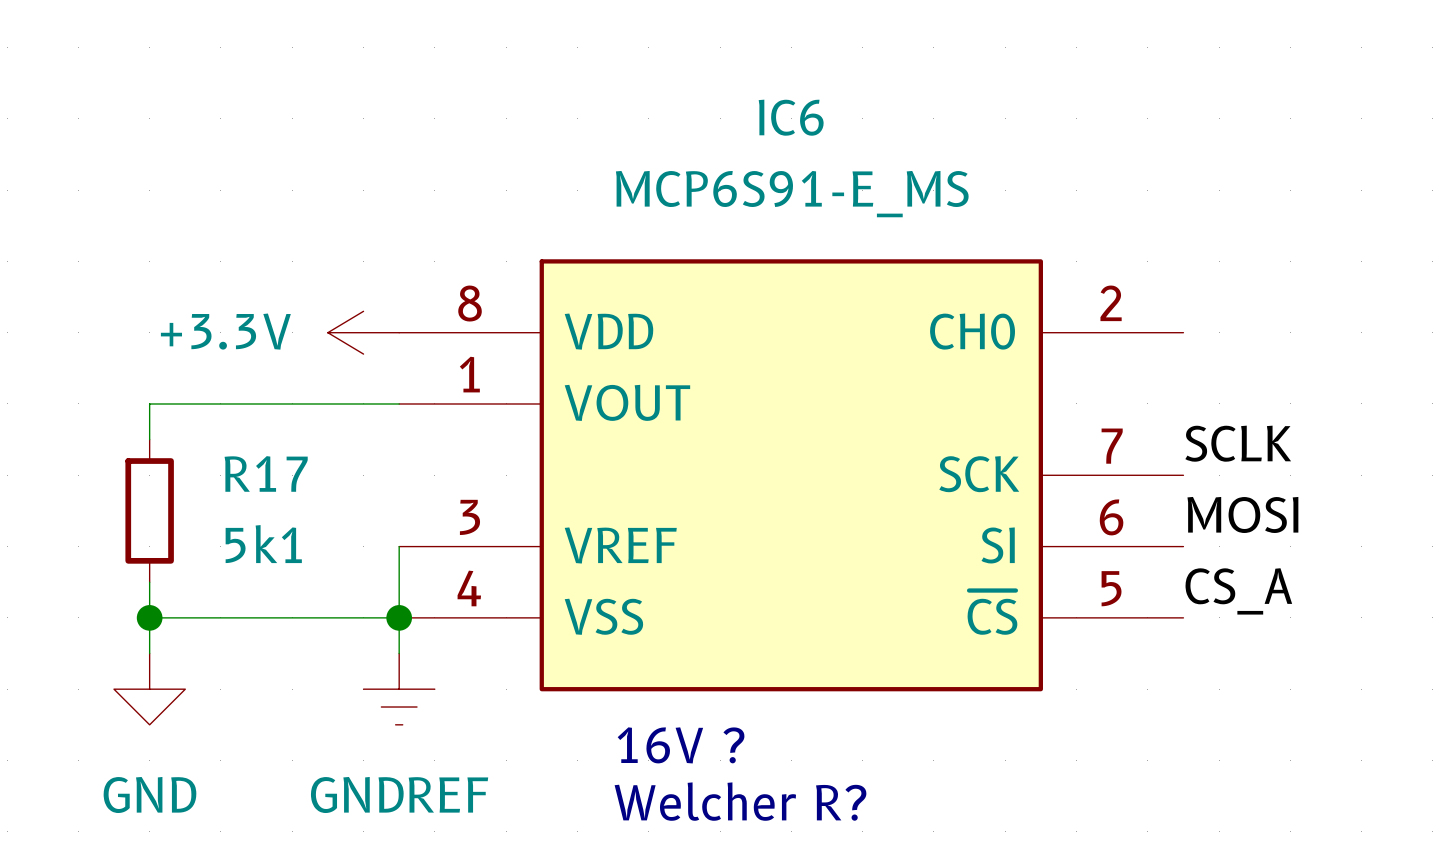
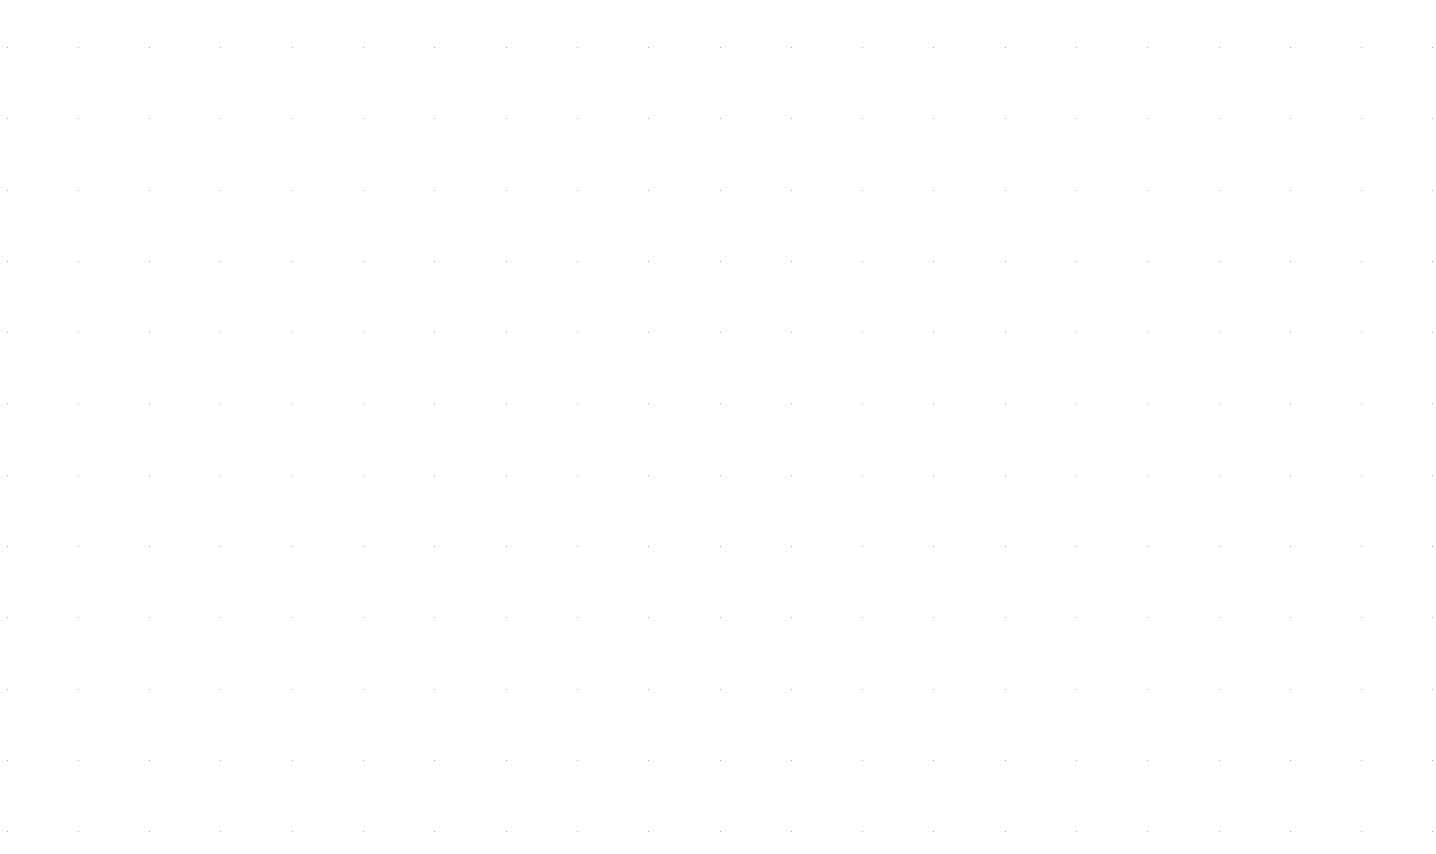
power symbol: +3.3V (363, 332) -> none
wire: (399, 403) (149, 403) (149, 439) -> none
label: SCLK (1238, 443) -> none
IC6: MCP6S91-E_MS (791, 475) -> none
R17: 5k1 (149, 510) -> none
label: MOSI (1242, 514) -> none
wire: (399, 546) (399, 653) -> none
wire: (149, 582) (149, 653) -> none
label: CS_A (1238, 591) -> none
wire: (149, 617) (399, 617) -> none
junction: (149, 617) -> none
junction: (399, 617) -> none
power symbol: GND (149, 689) -> none
power symbol: GNDREF (399, 689) -> none
text: 16V ? (681, 745) -> none
text: Welcher R? (740, 801) -> none

